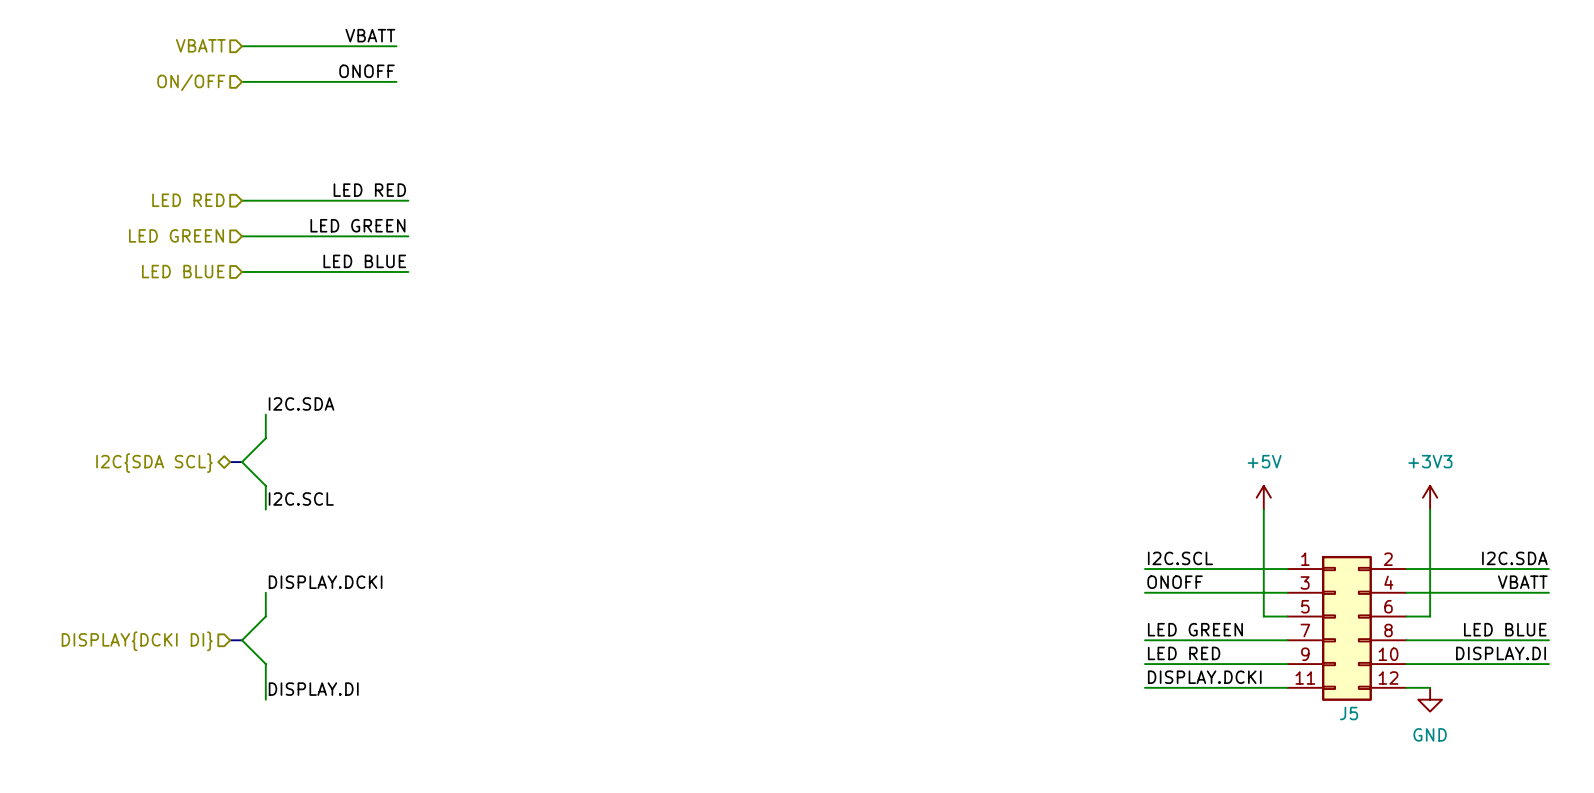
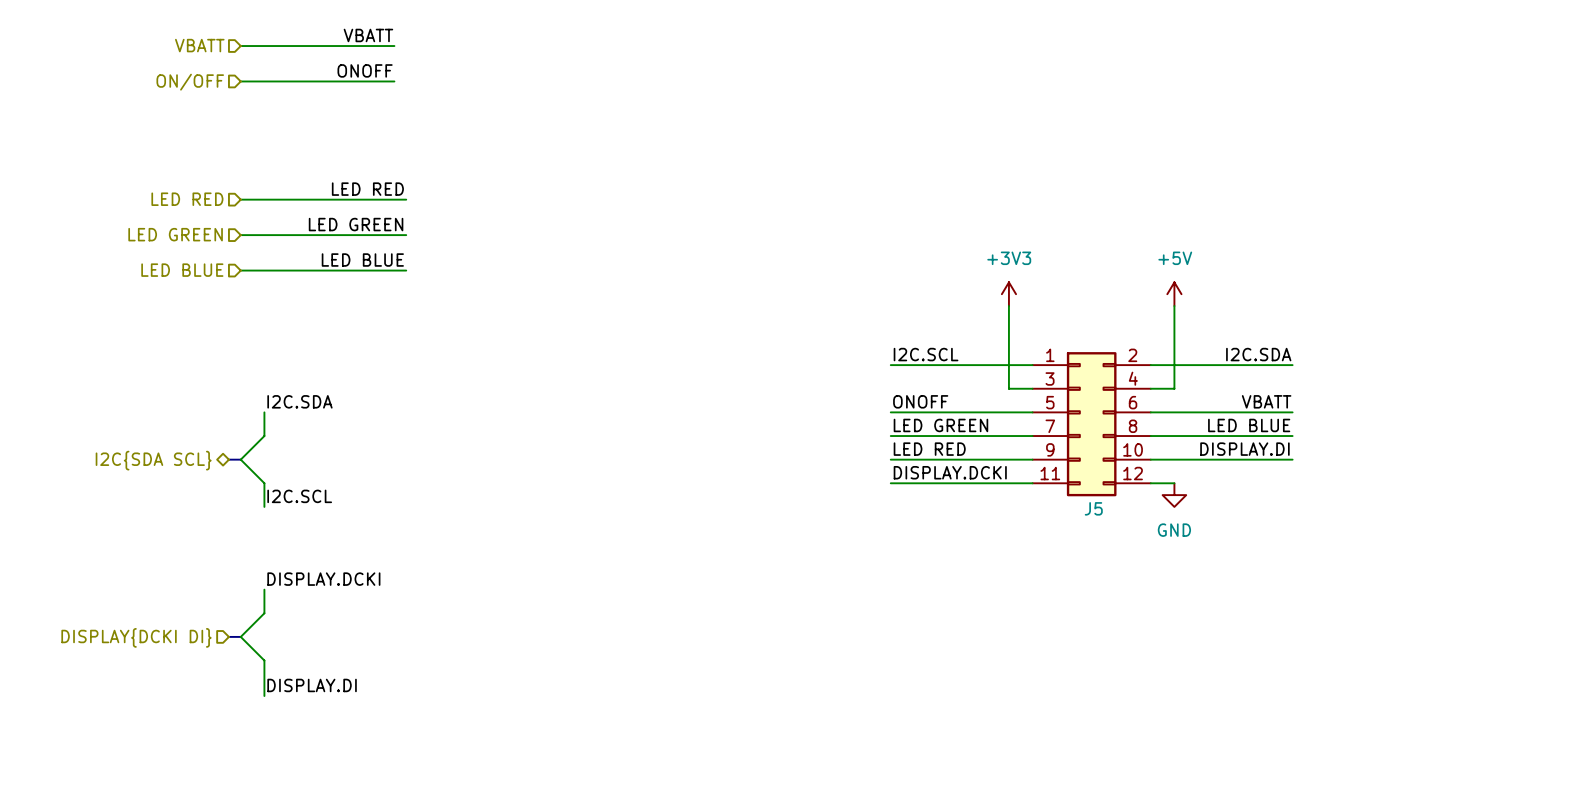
power symbol: none -> +3V3 (1008, 294)
wire: none -> (1008, 306) (1008, 388) (1032, 388)
wire: none -> (1174, 306) (1174, 388) (1150, 388)
label: none -> I2C.SCL (926, 354)
label: none -> I2C.SDA (1258, 354)
wire: none -> (890, 365) (1032, 365)
label: none -> ONOFF (920, 401)
label: none -> VBATT (1266, 401)
wire: none -> (890, 412) (1032, 412)
label: none -> LED GREEN (940, 425)
label: none -> LED BLUE (1249, 425)
wire: none -> (890, 436) (1032, 436)
label: none -> LED RED (929, 449)
label: none -> DISPLAY.DI (1244, 449)
wire: none -> (890, 459) (1032, 459)
label: none -> DISPLAY.DCKI (950, 472)
wire: none -> (890, 483) (1032, 483)
wire: none -> (1150, 483) (1174, 483)
power symbol: none -> GND (1174, 495)
power symbol position: +5V (1263, 497) -> +5V (1174, 294)
power symbol: +3V3 (1430, 497) -> none
wire: (1263, 509) (1263, 616) (1287, 616) -> none
wire: (1430, 509) (1430, 616) (1406, 616) -> none
label: I2C.SCL (1180, 558) -> none
label: I2C.SDA (1514, 558) -> none
wire: (1144, 569) (1287, 569) -> none
wire: (1406, 569) (1548, 569) -> none
label: ONOFF (1175, 582) -> none
label: VBATT (1522, 582) -> none
wire: (1144, 592) (1287, 592) -> (1150, 365) (1292, 365)
wire: (1406, 592) (1548, 592) -> none
J5 position: (1346, 628) -> (1091, 424)
label: LED GREEN (1195, 629) -> none
label: LED BLUE (1505, 629) -> none
wire: (1144, 640) (1287, 640) -> (1150, 412) (1292, 412)
wire: (1406, 640) (1548, 640) -> none
label: LED RED (1184, 653) -> none
label: DISPLAY.DI (1501, 653) -> none
wire: (1144, 664) (1287, 664) -> (1150, 436) (1292, 436)
wire: (1406, 664) (1548, 664) -> none
label: DISPLAY.DCKI (1204, 677) -> none
wire: (1144, 687) (1287, 687) -> (1150, 459) (1292, 459)
wire: (1406, 687) (1430, 687) -> none
power symbol: GND (1430, 699) -> none

